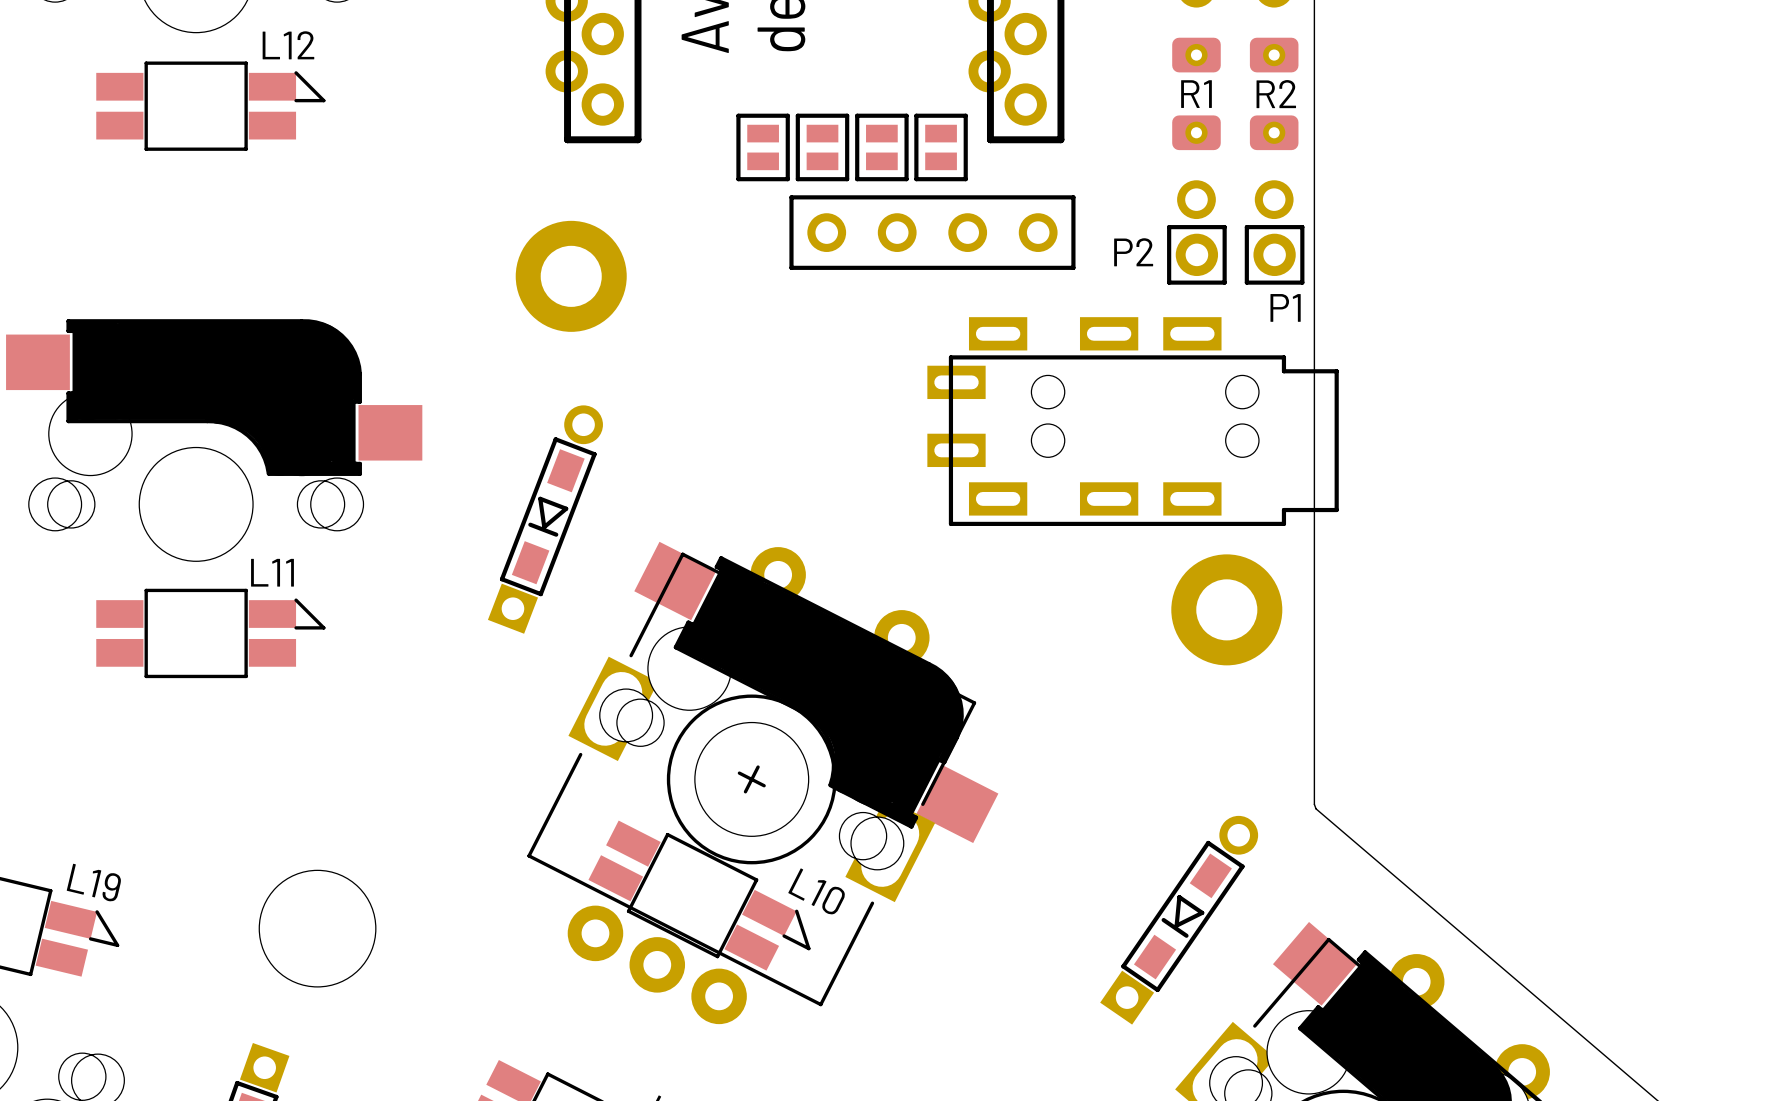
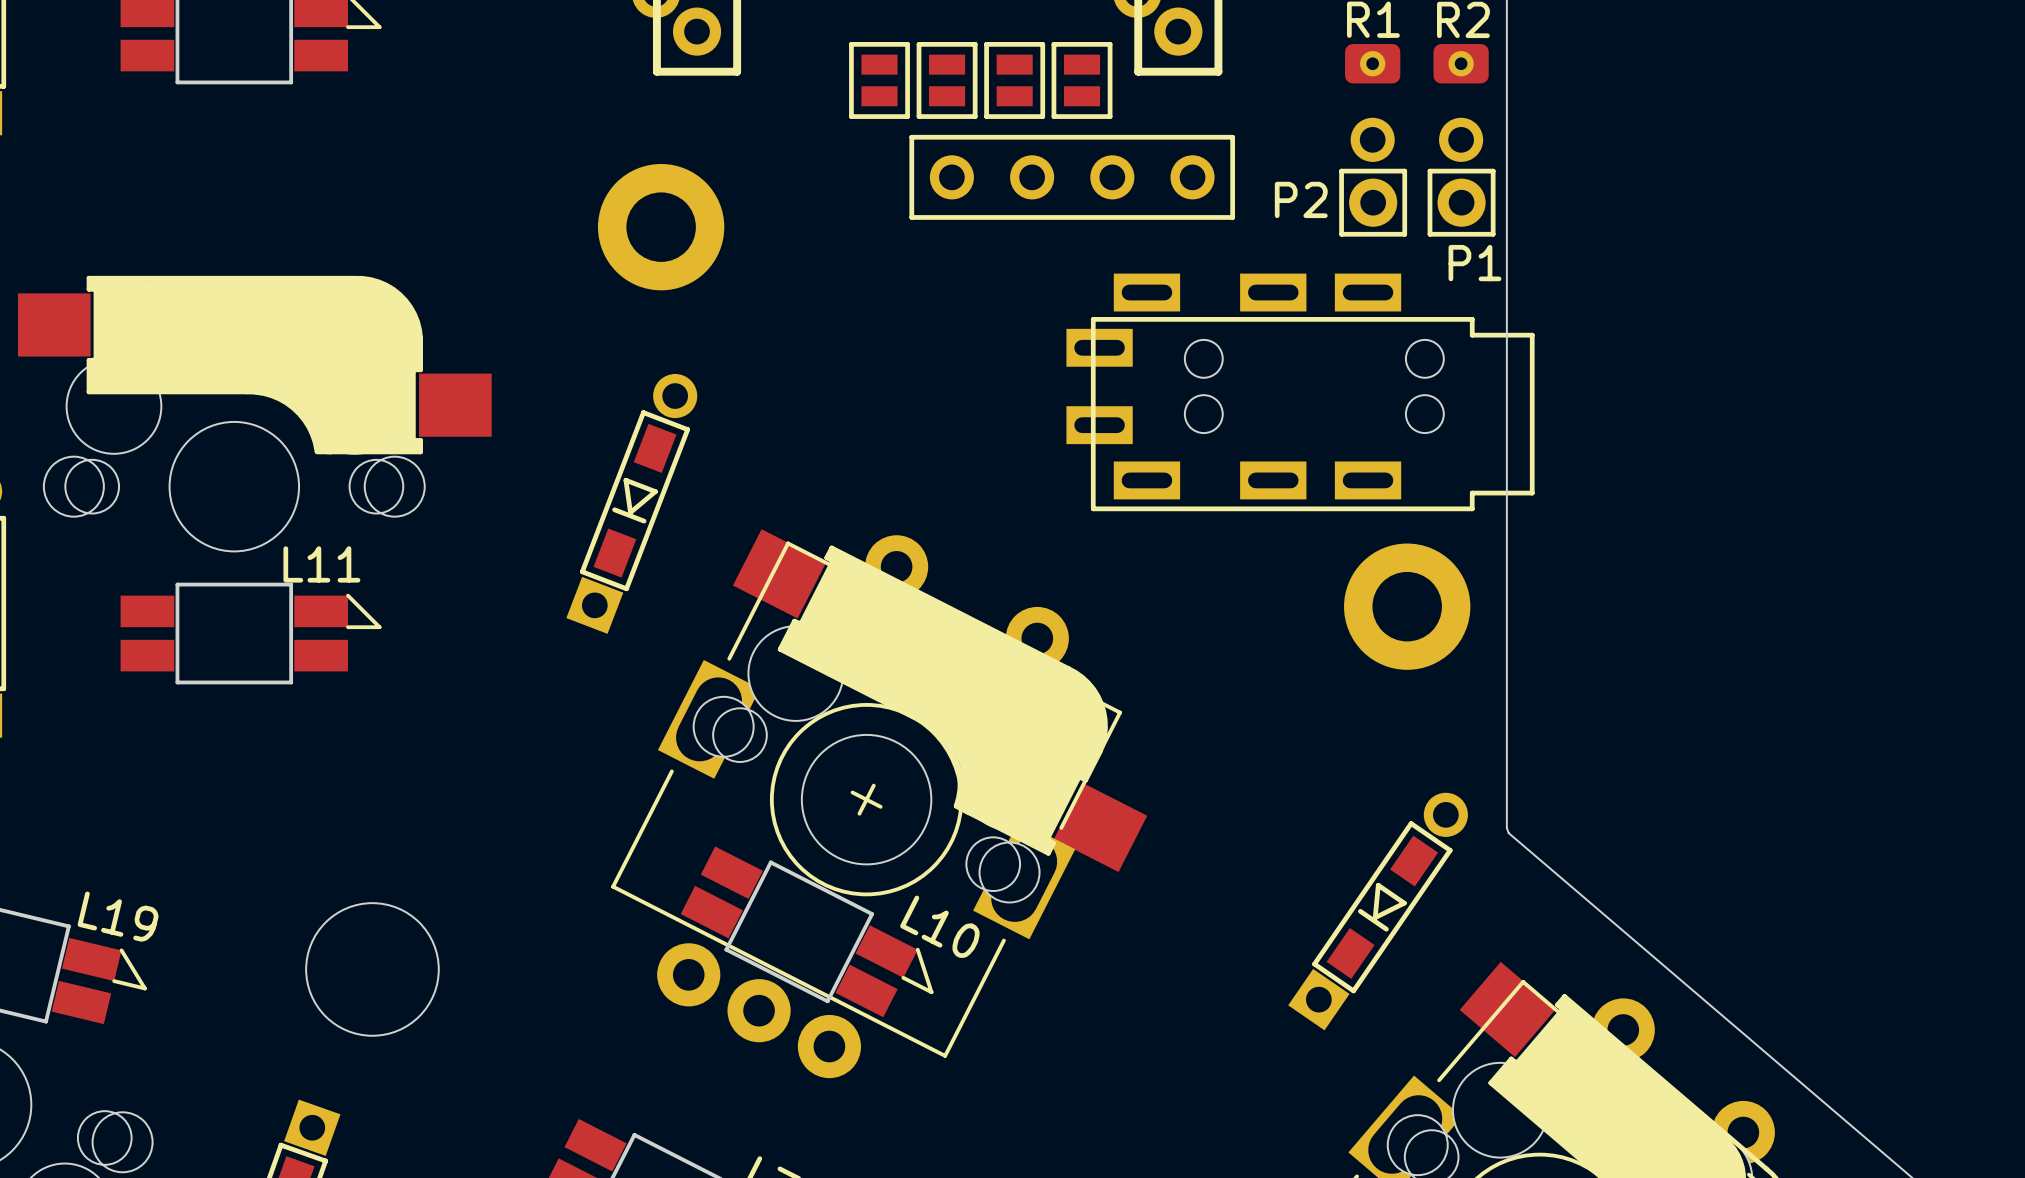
part position: (1179, 920) -> (1378, 911)

